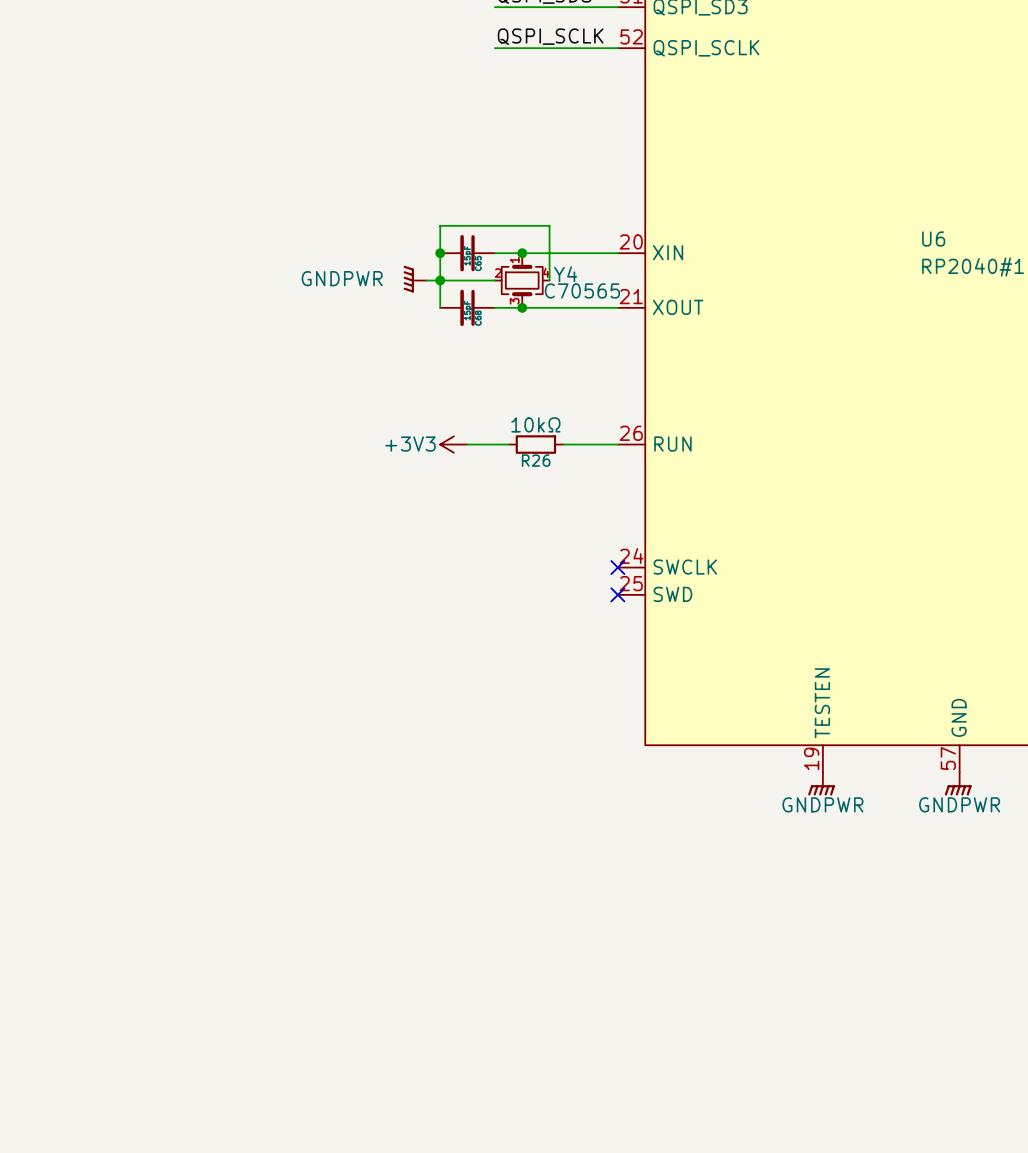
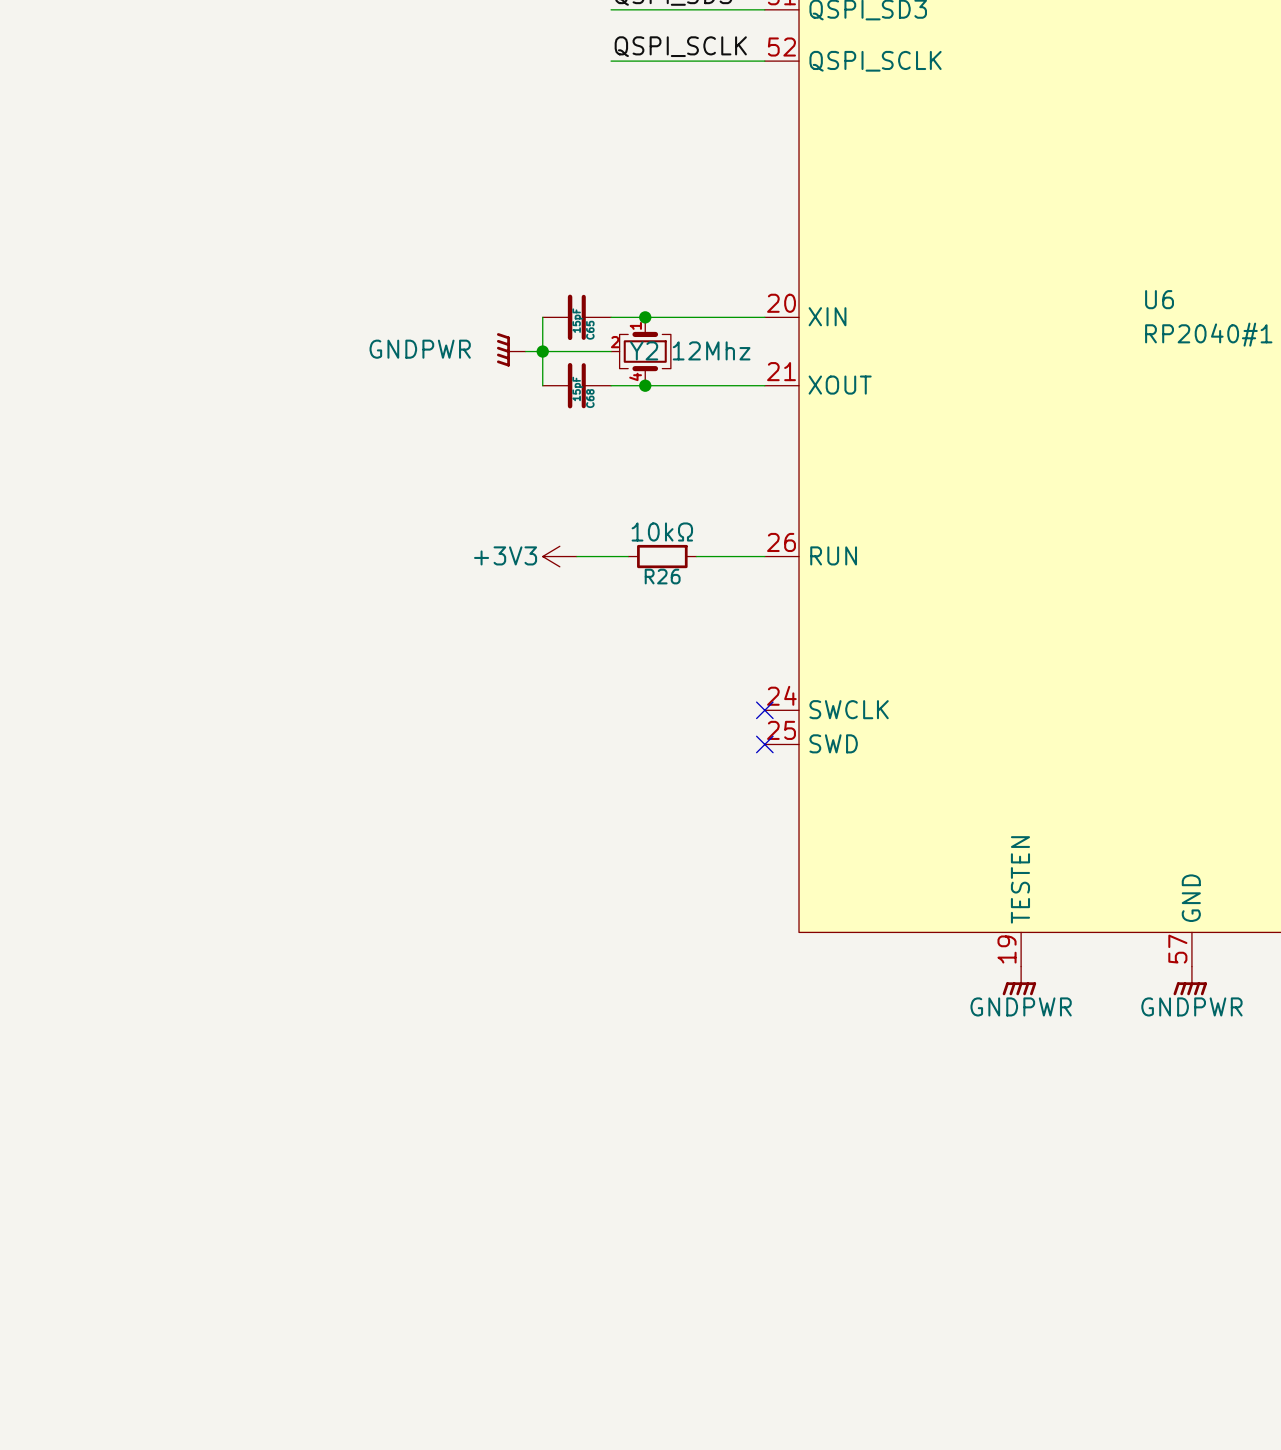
wire: (440, 253) (440, 225) (549, 225) (549, 280) -> none
junction: (440, 253) -> none
Y2: none -> 12Mhz (640, 351)
Y4: C70565 (522, 280) -> none

